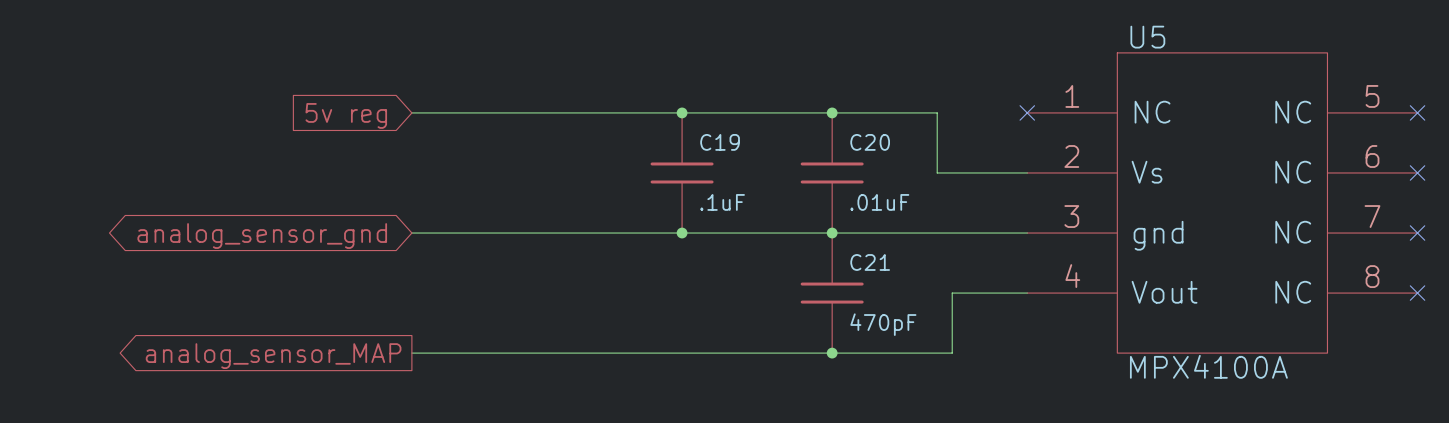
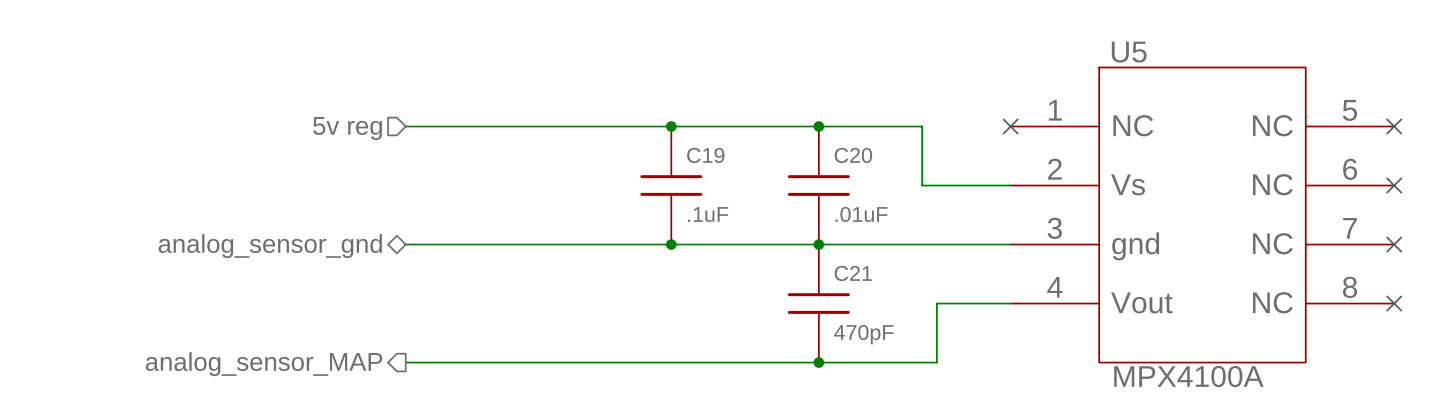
hierarchical label: none -> 5v reg (347, 128)
global label: 5v reg (346, 115) -> none
hierarchical label: none -> analog_sensor_gnd (270, 246)
global label: analog_sensor_gnd (262, 236) -> none
hierarchical label: none -> analog_sensor_MAP (264, 364)
global label: analog_sensor_MAP (273, 356) -> none

